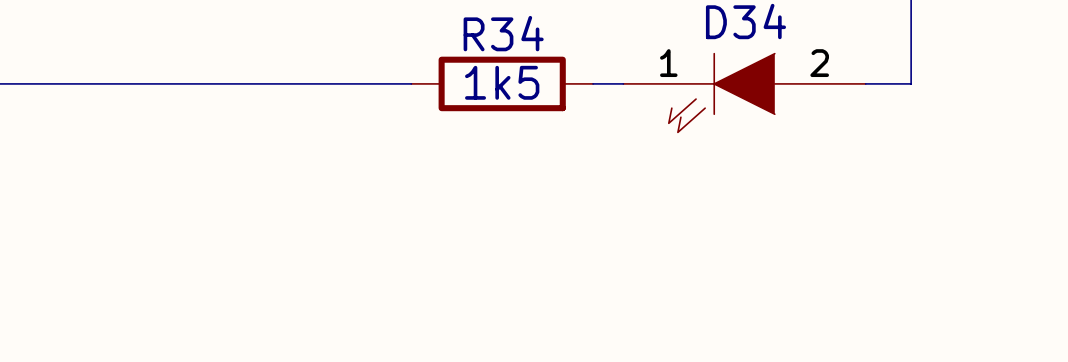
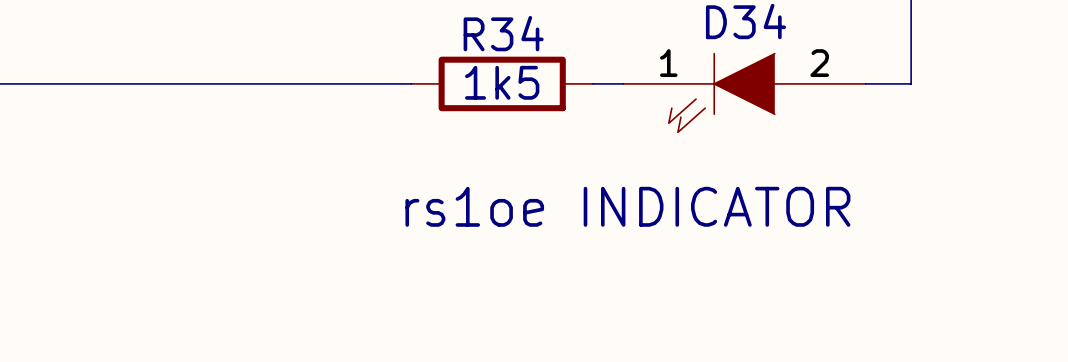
text: none -> rs1oe INDICATOR (627, 206)

